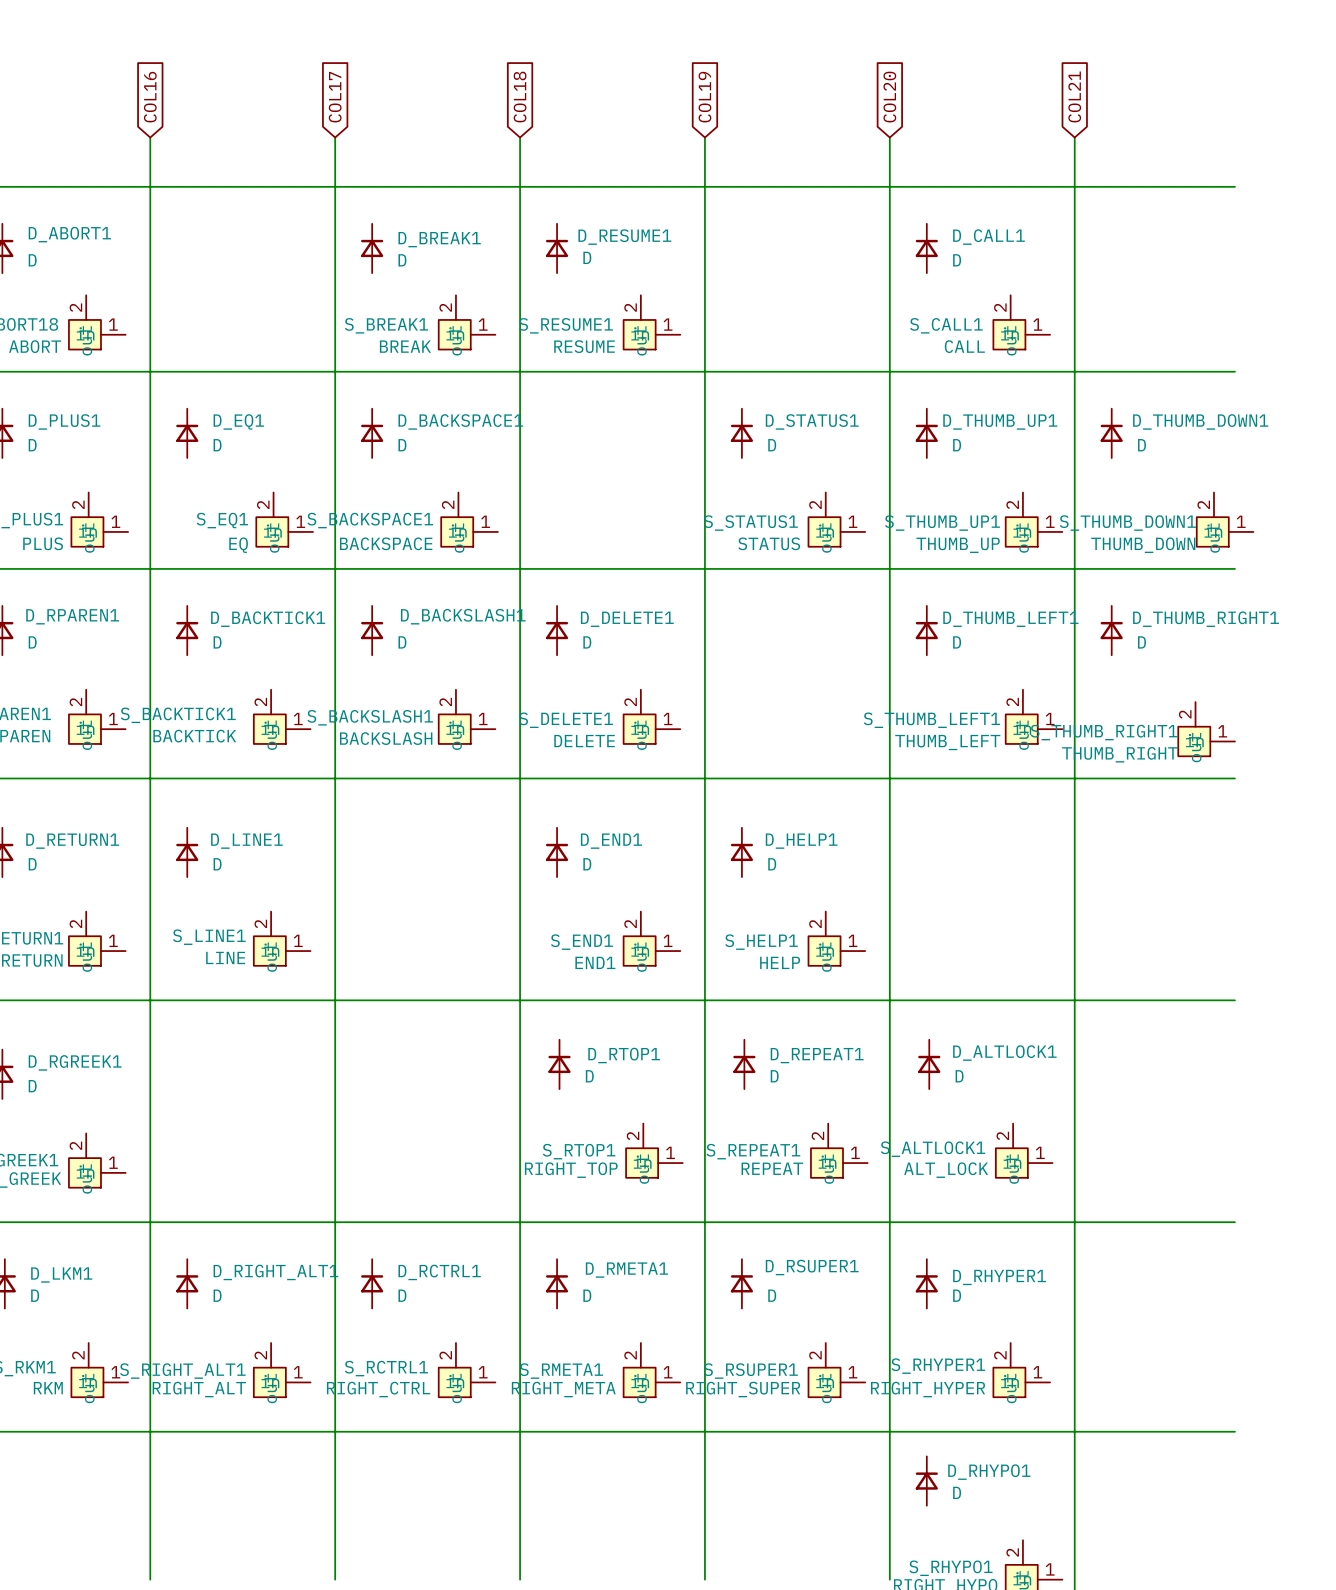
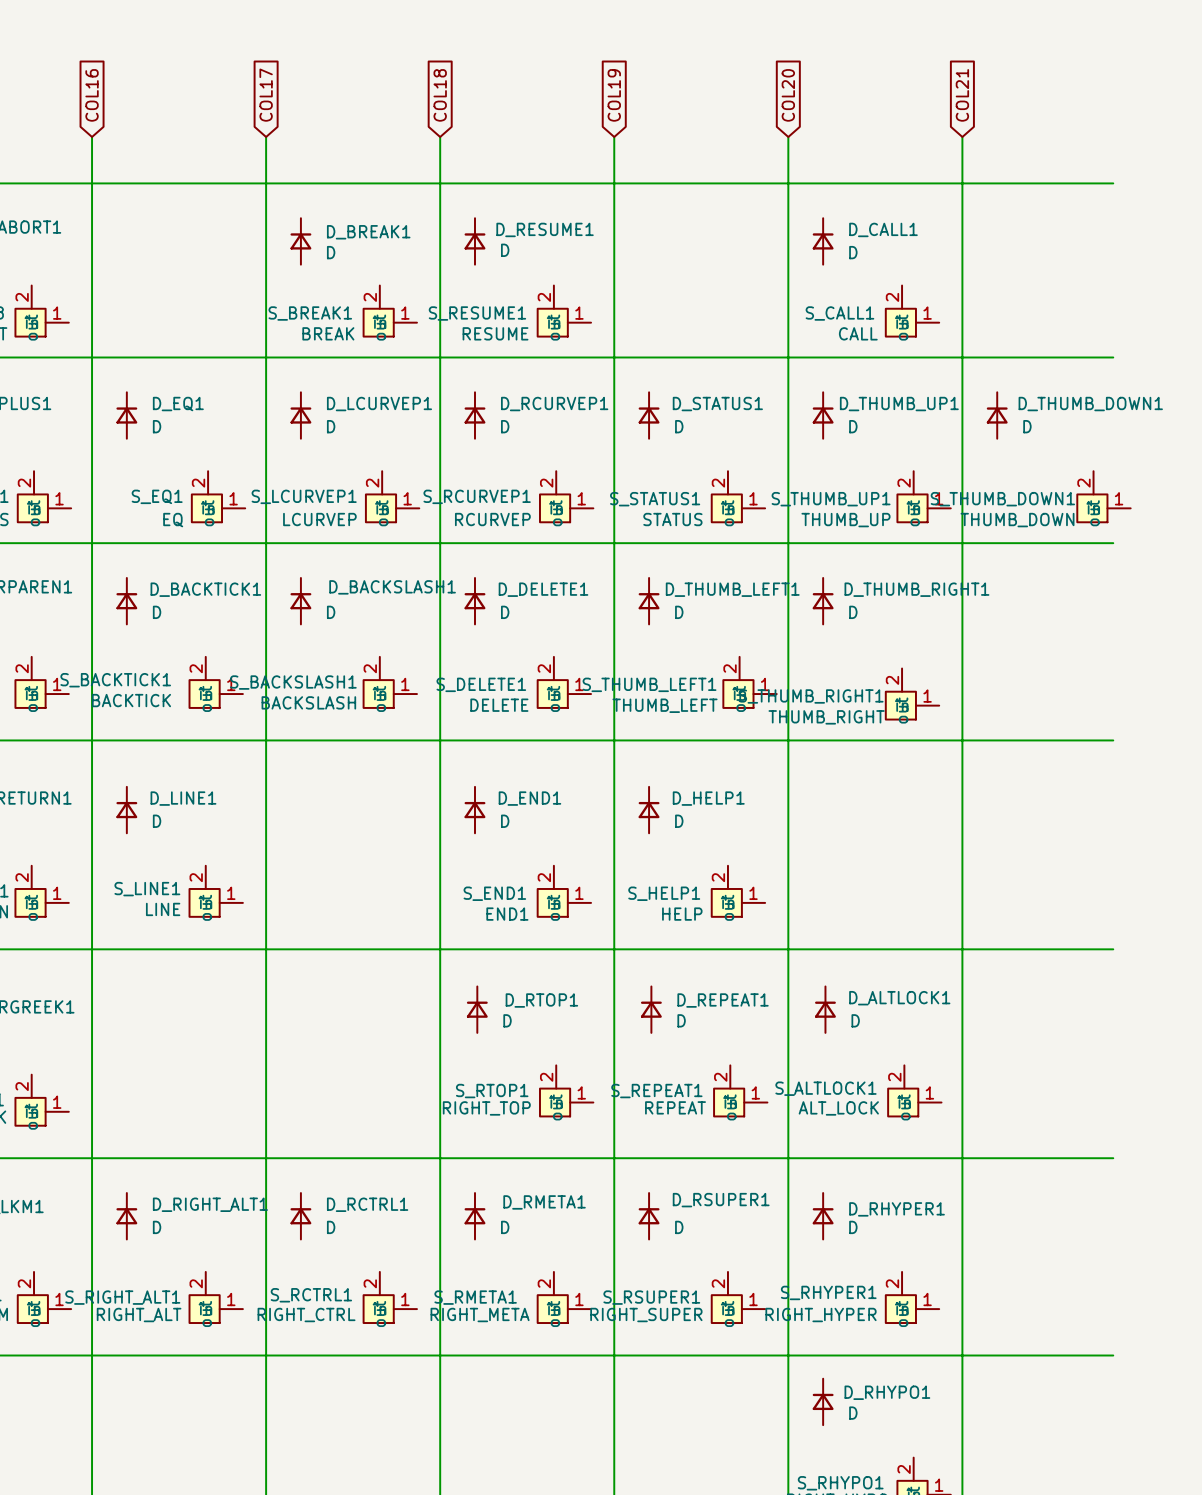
D_BACKSPACE1 name: D_BACKSPACE1 (460, 421) -> D_LCURVEP1 (379, 404)
D_RCURVEP1: none -> D (474, 415)
S_RCURVEP1: none -> RCURVEP (566, 496)
S_BACKSPACE1 name: S_BACKSPACE1 (370, 520) -> S_LCURVEP1 (304, 496)
S_BACKSPACE1 value: BACKSPACE (386, 543) -> LCURVEP (319, 519)
D_THUMB_LEFT1 name: D_THUMB_LEFT1 (1010, 619) -> D_THUMB_RIGHT1 (916, 589)
D_THUMB_LEFT1: none -> D (649, 601)
D_THUMB_RIGHT1: D (1111, 630) -> none
S_THUMB_LEFT1 position: (1034, 716) -> (750, 682)
S_THUMB_RIGHT1 position: (1206, 729) -> (912, 694)

